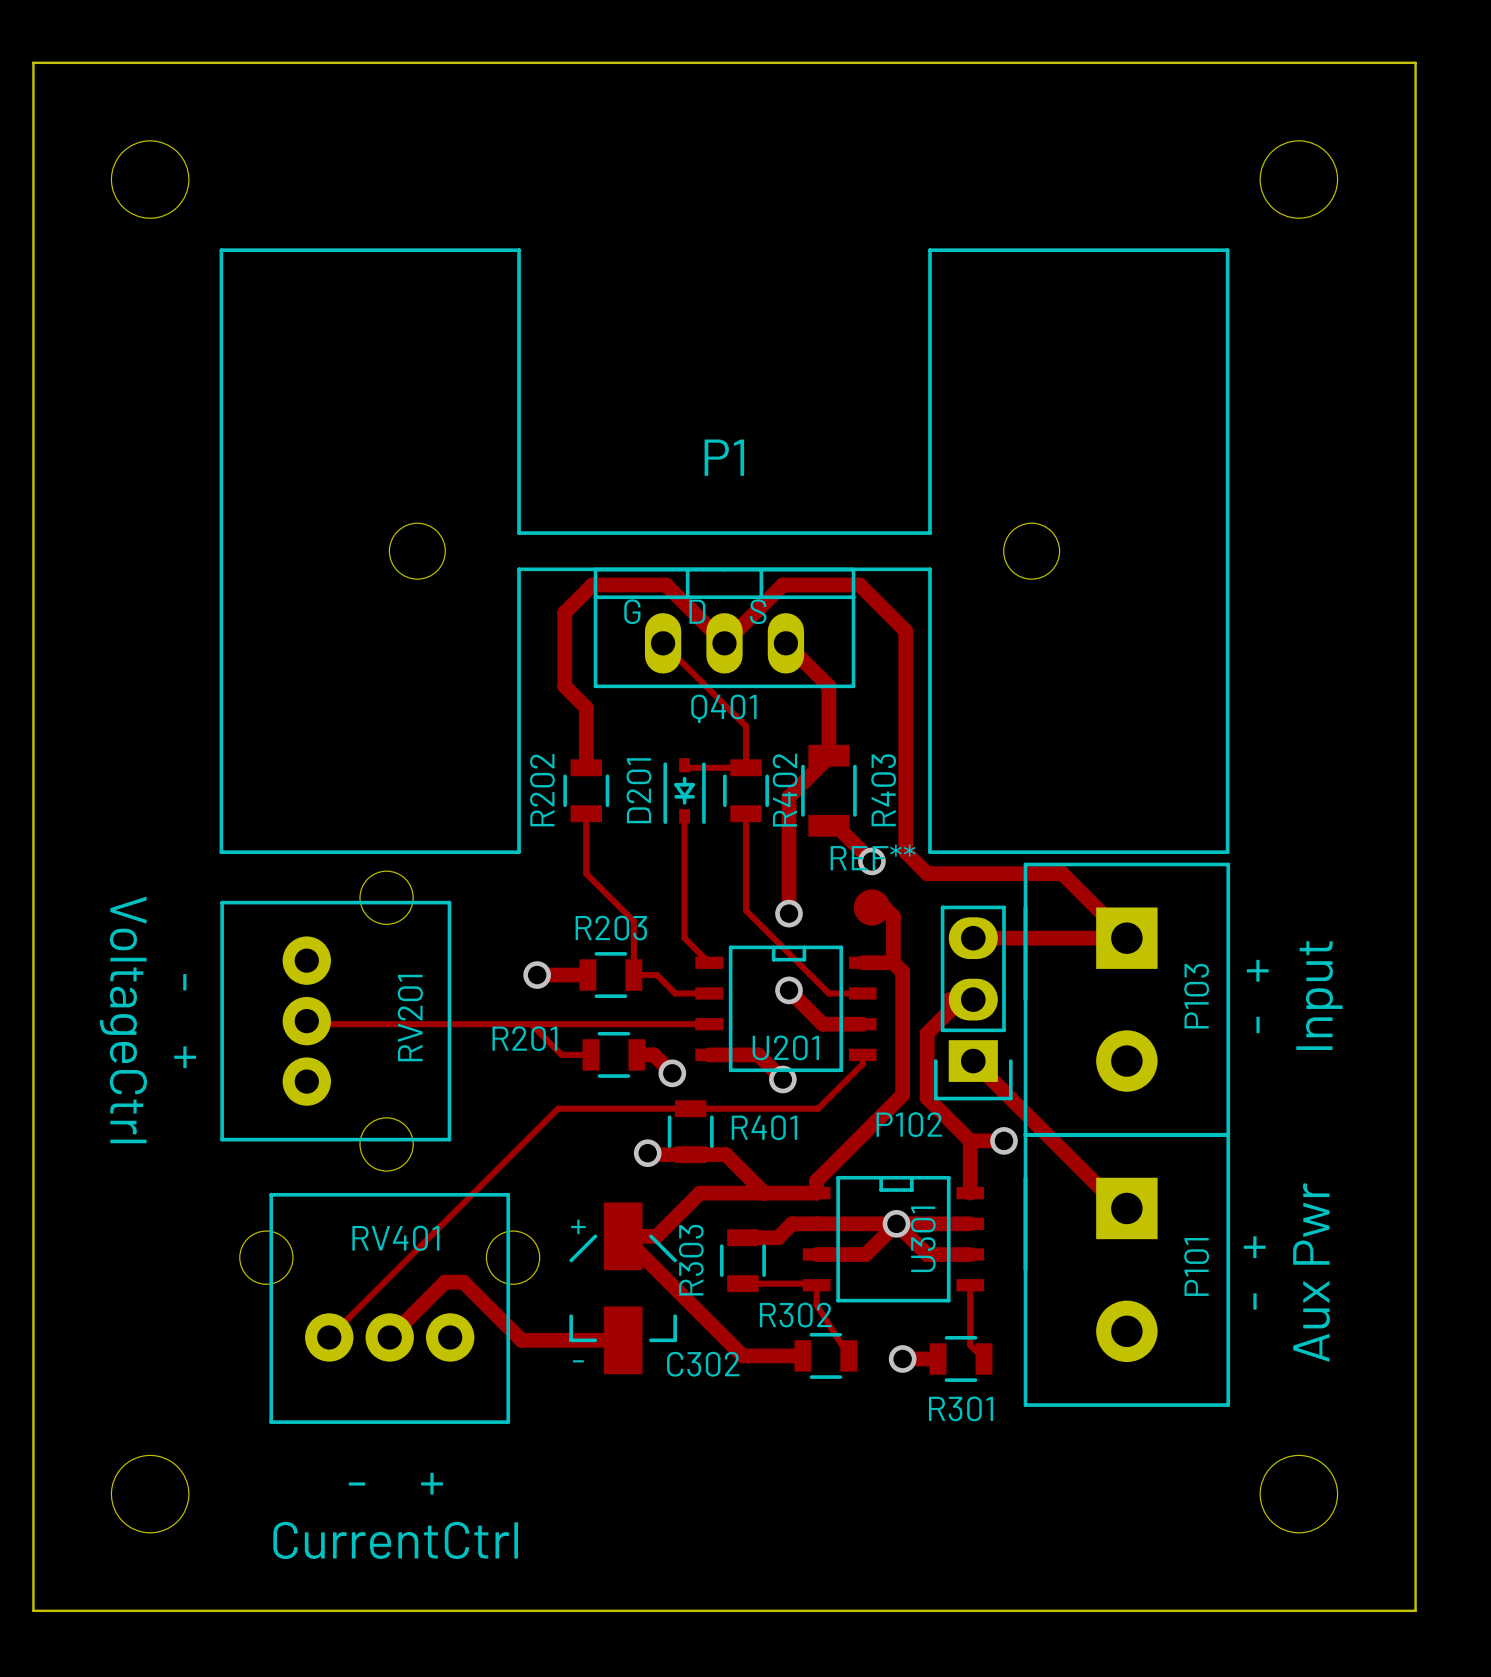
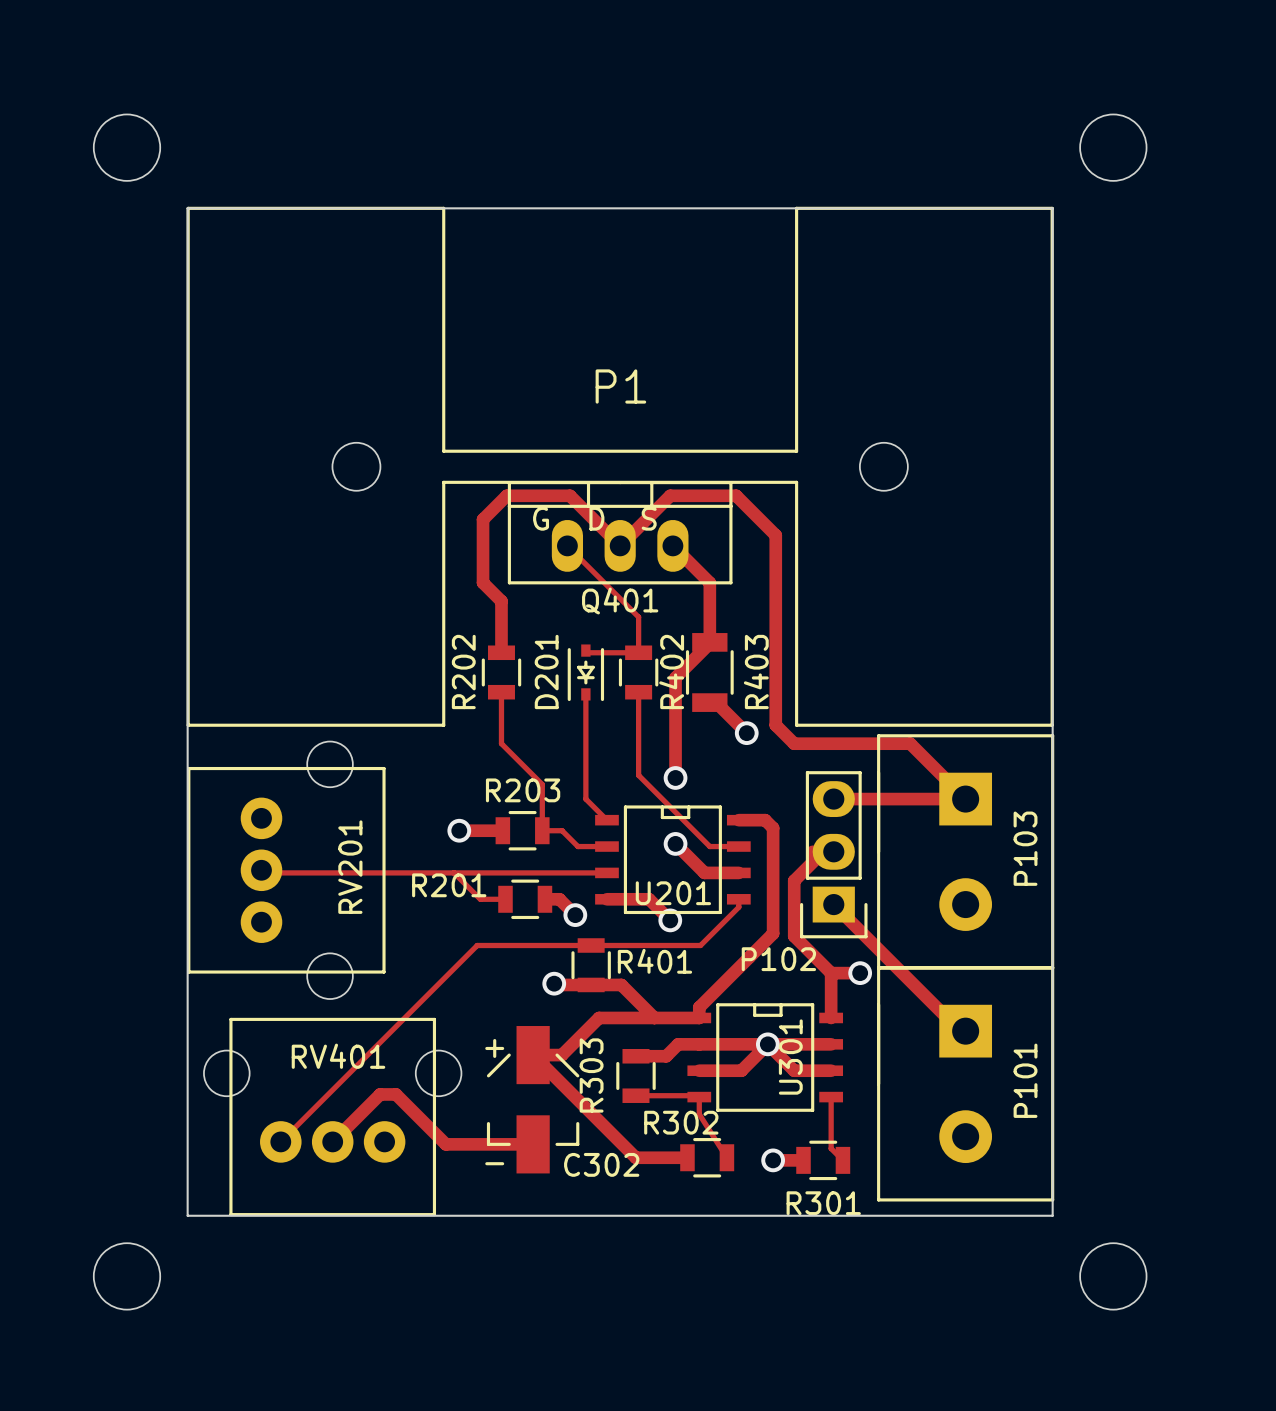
board edge: (33, 62) (33, 1610) (1415, 1610) (1415, 62) (33, 62) -> (187, 208) (187, 1215) (1052, 1215) (1052, 208) (187, 208)
track: (871, 907) (884, 907) (893, 916) (893, 962) -> none
REF**: (871, 907) -> none
text: Input (1319, 995) -> none
text: - + (1257, 996) -> none
text: VoltageCtrl (123, 1019) -> none
text: - + (185, 1021) -> none
text: - + (1254, 1272) -> none
text: Aux Pwr (1311, 1272) -> none
text: - + (395, 1483) -> none
text: CurrentCtrl (395, 1540) -> none

